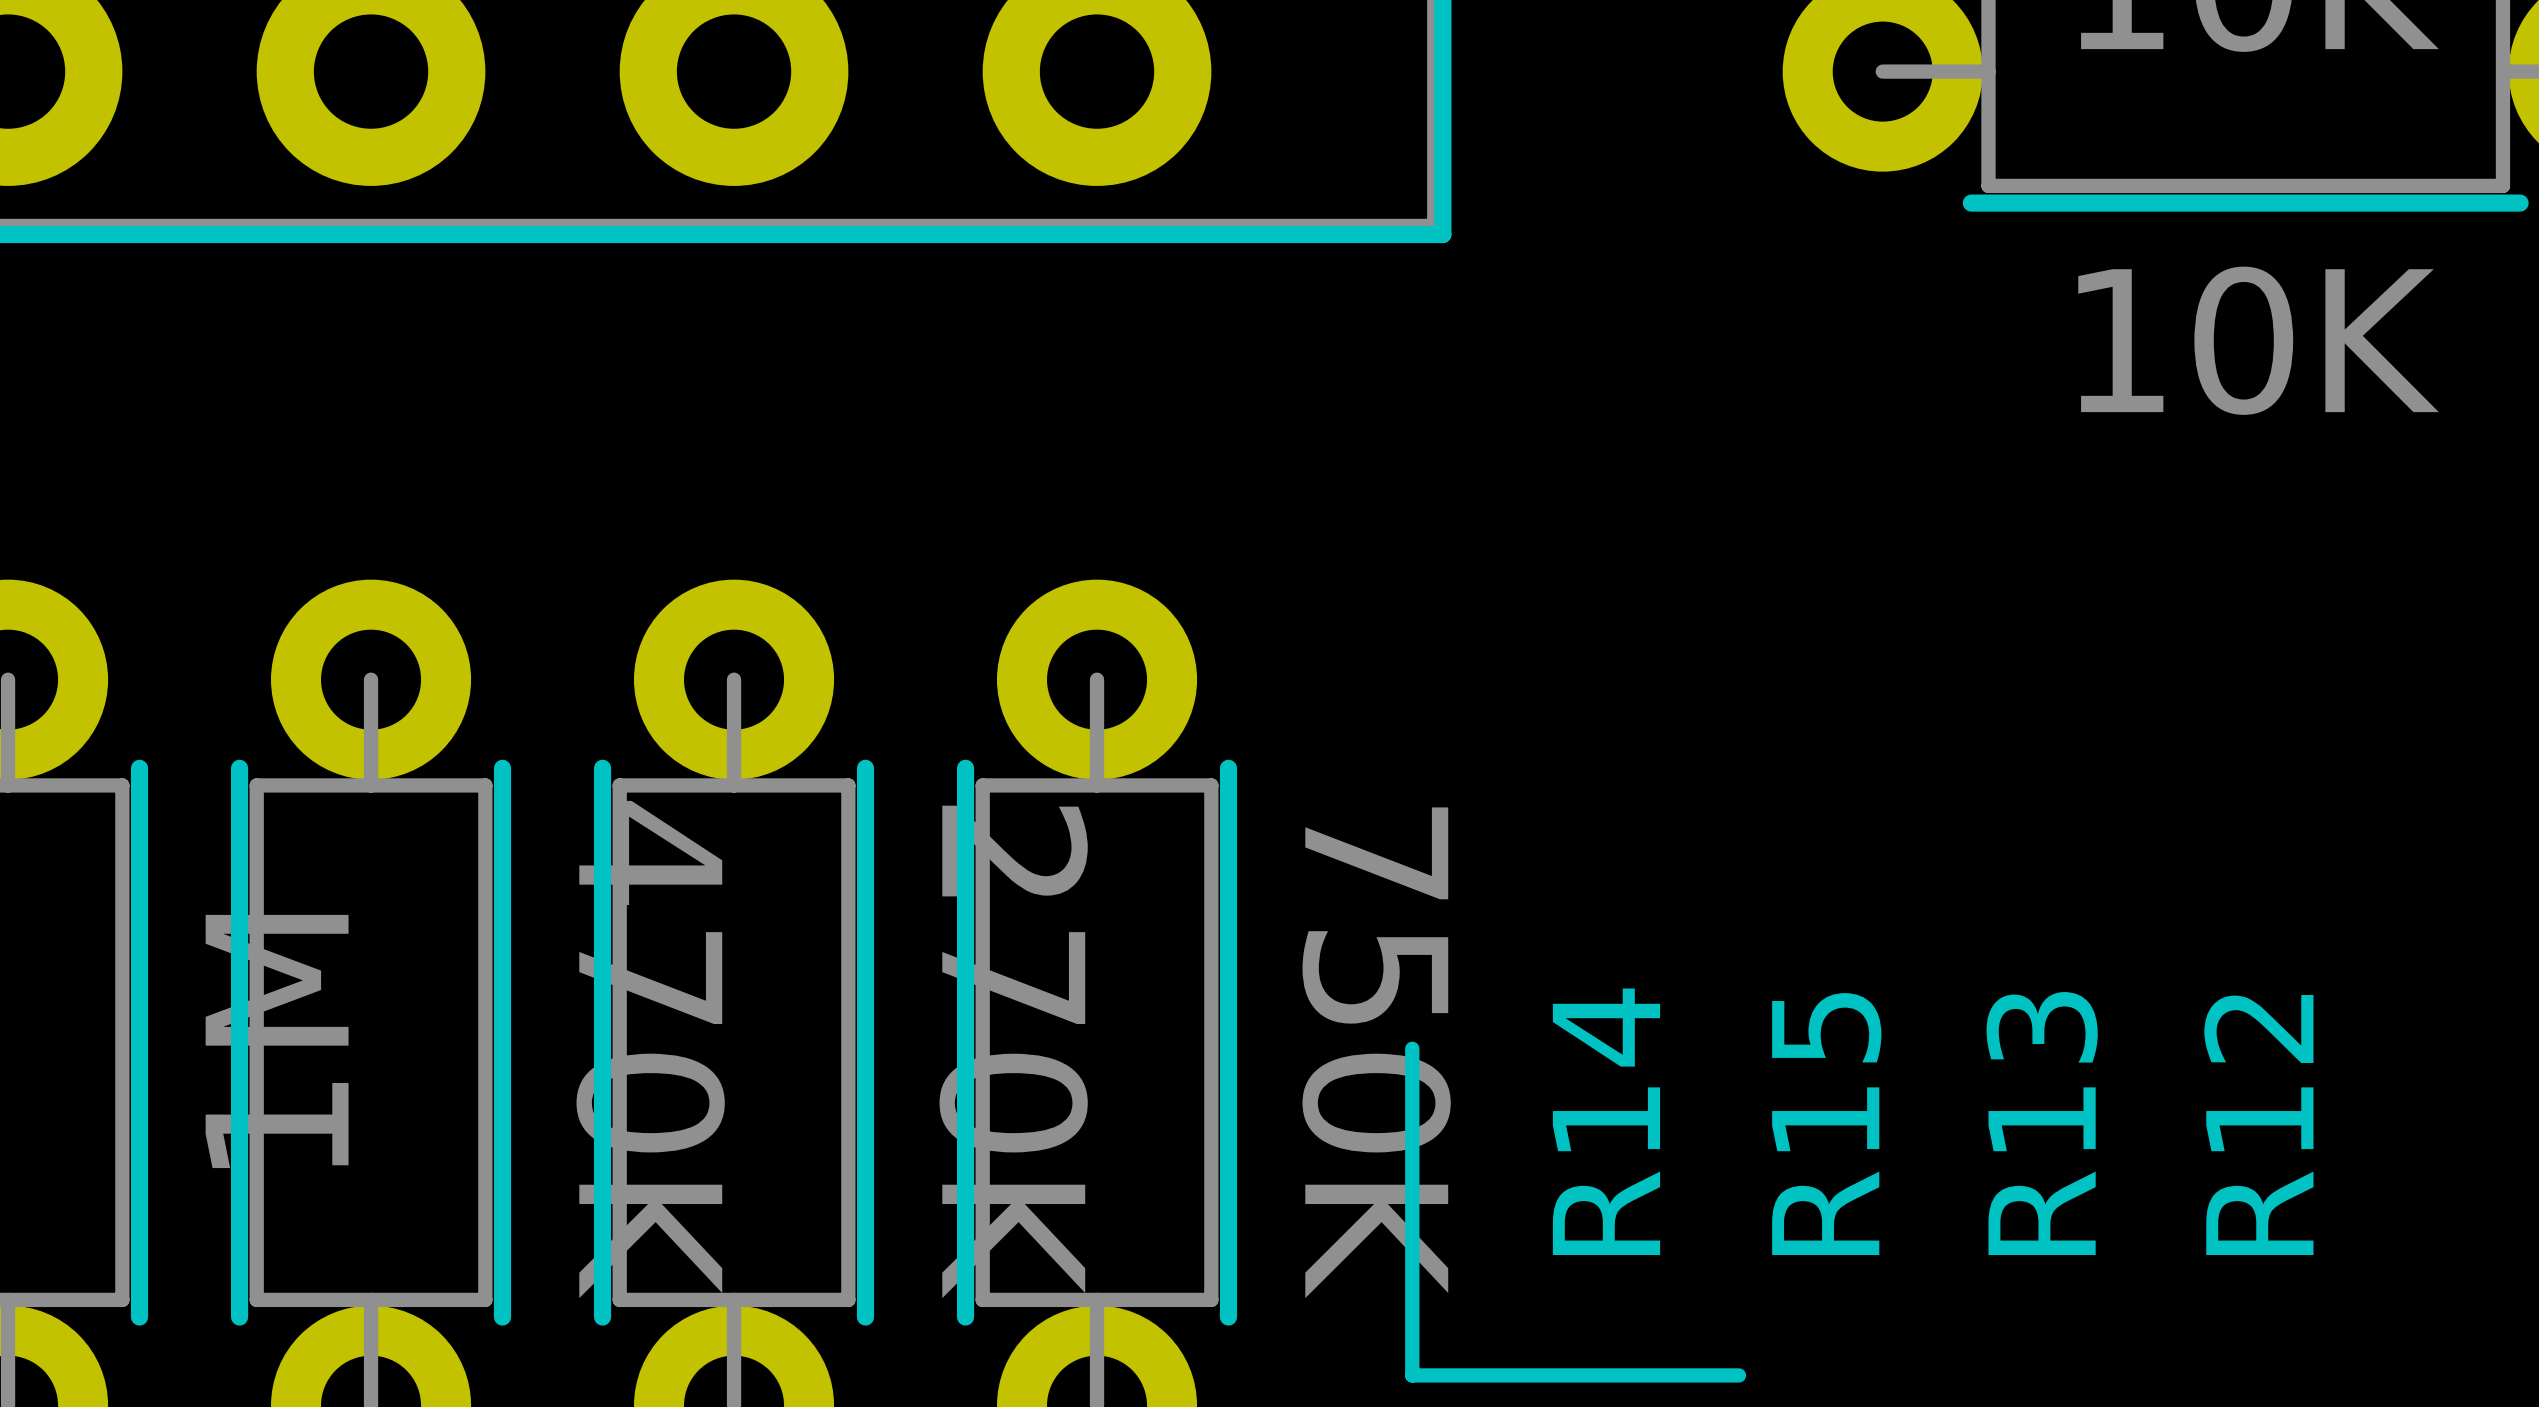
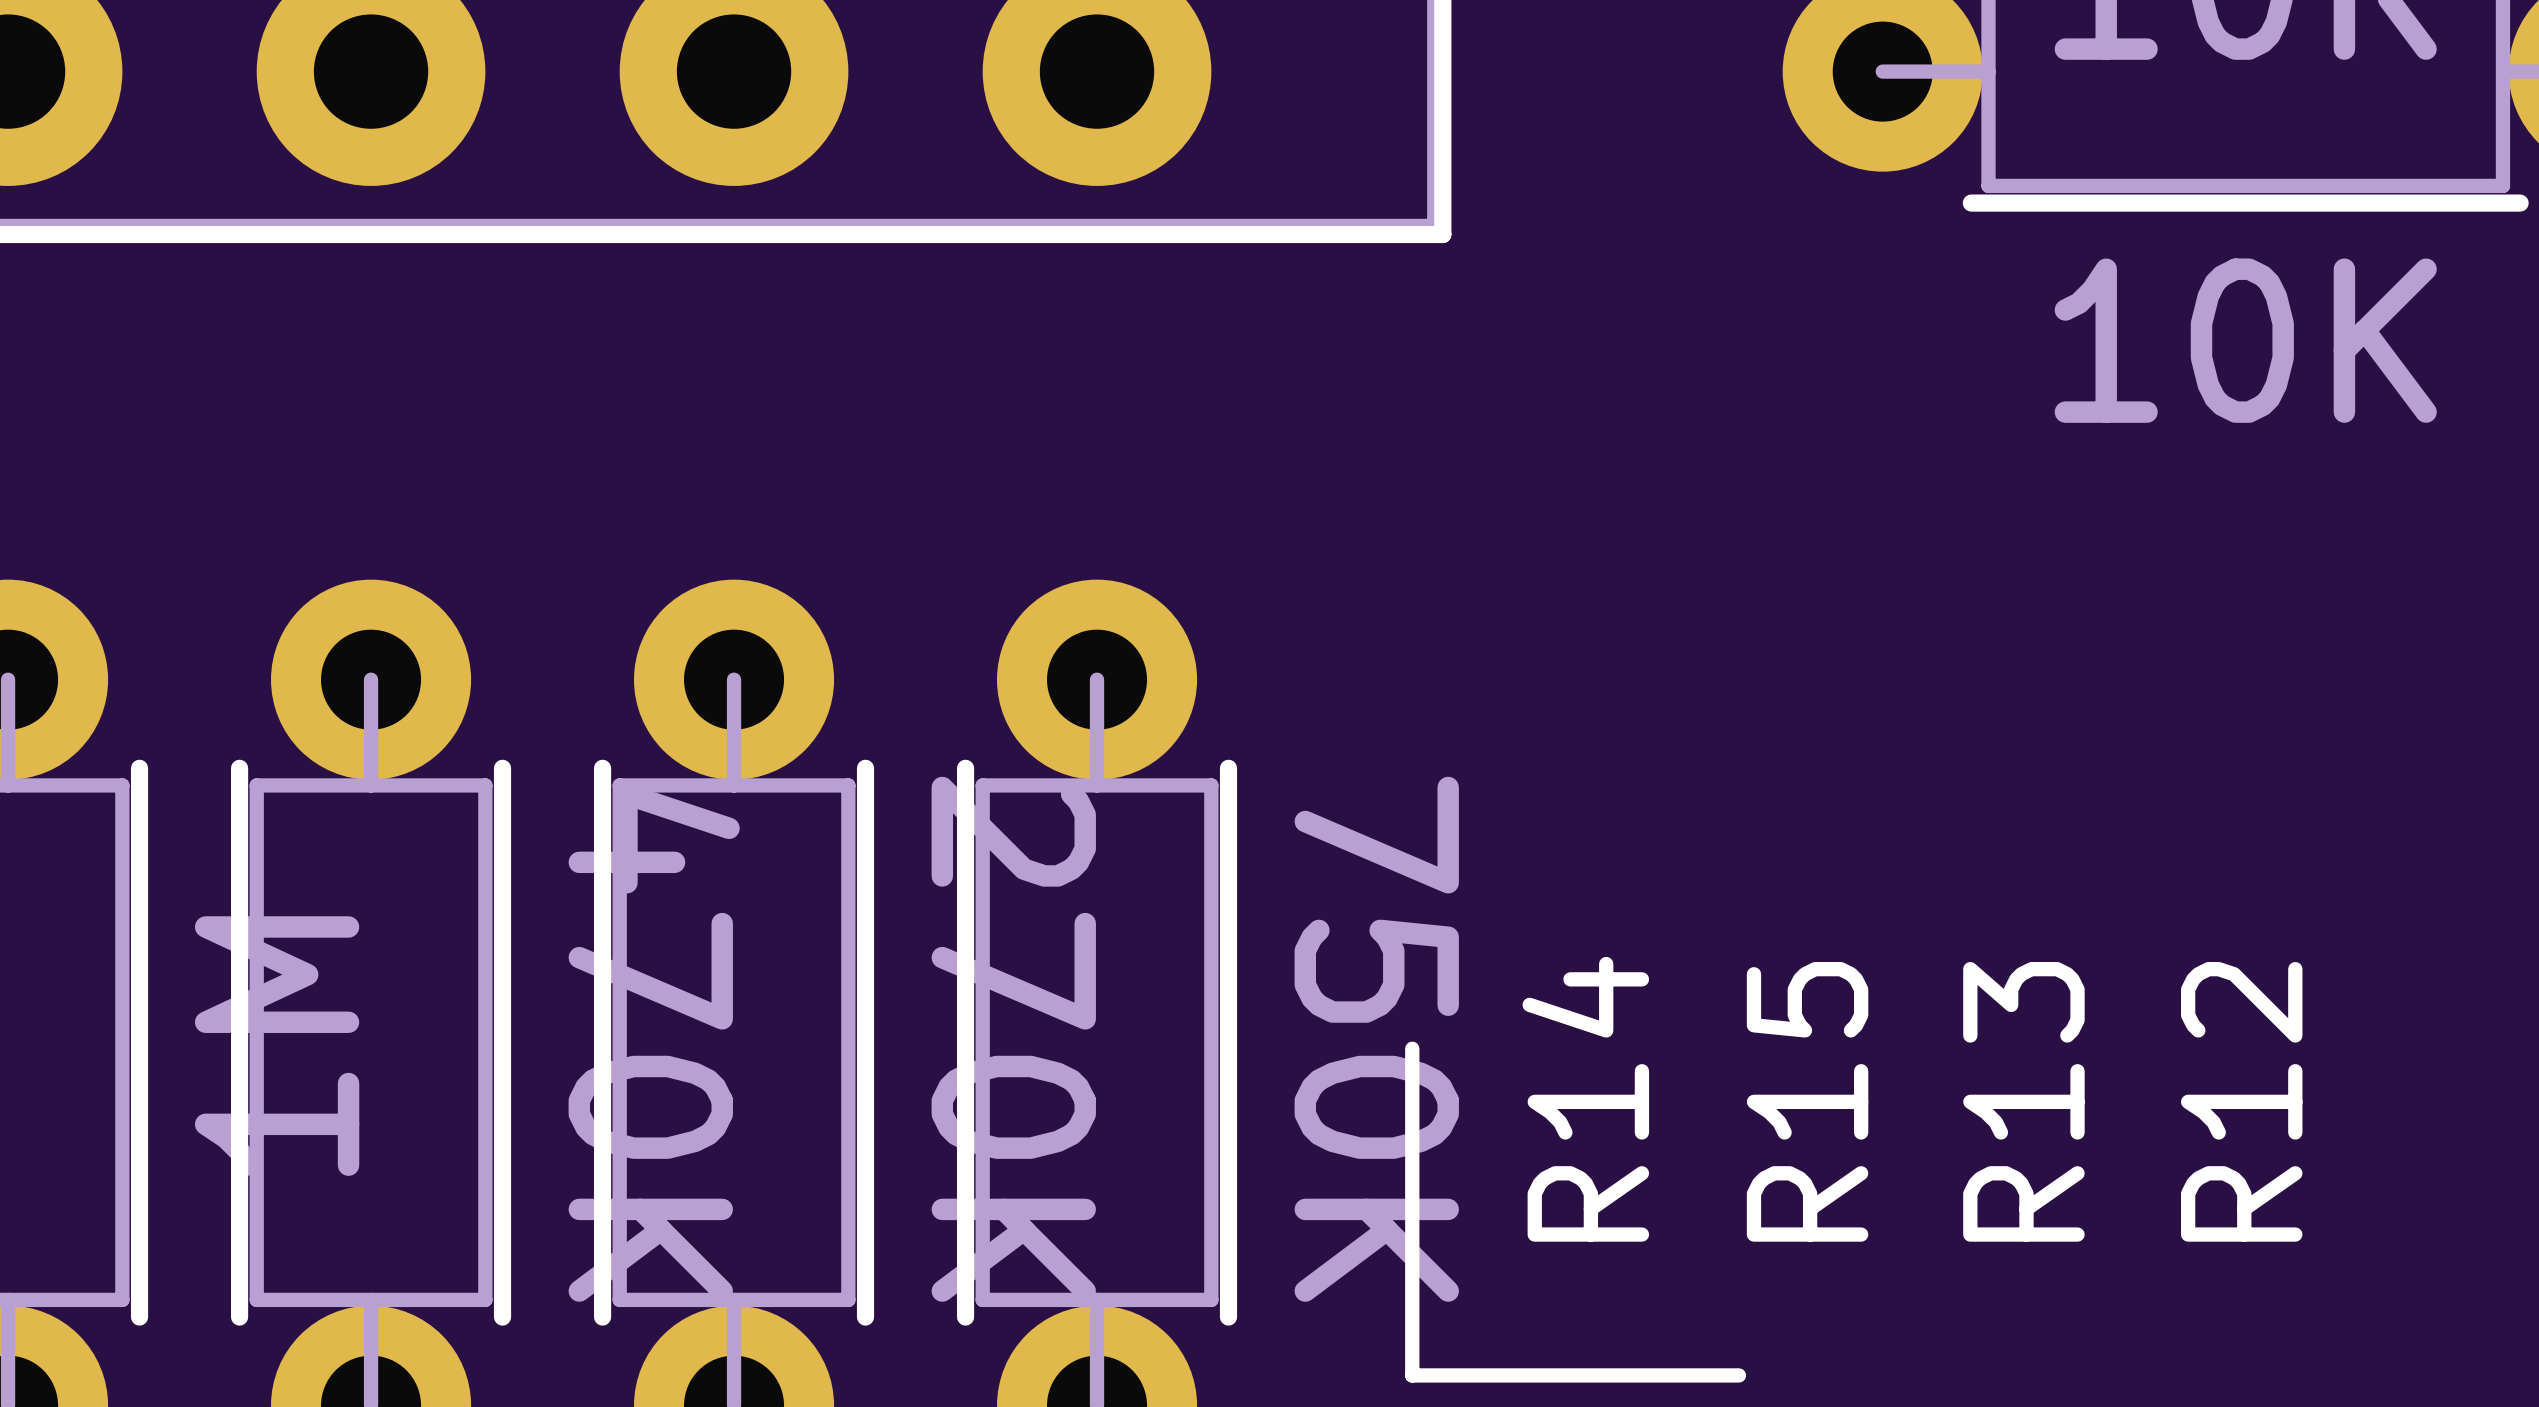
R14 name position: R14 (1606, 1121) -> R14 (1585, 1099)
R13 name position: R13 (2042, 1123) -> R13 (2023, 1101)
R15 name position: R15 (1826, 1124) -> R15 (1807, 1101)
R12 name position: R12 (2258, 1125) -> R12 (2241, 1101)

